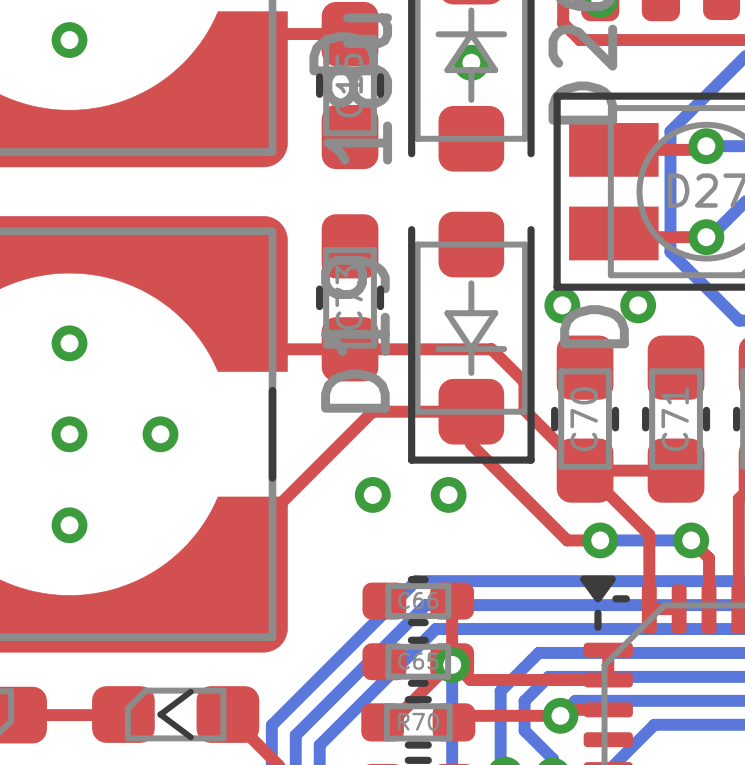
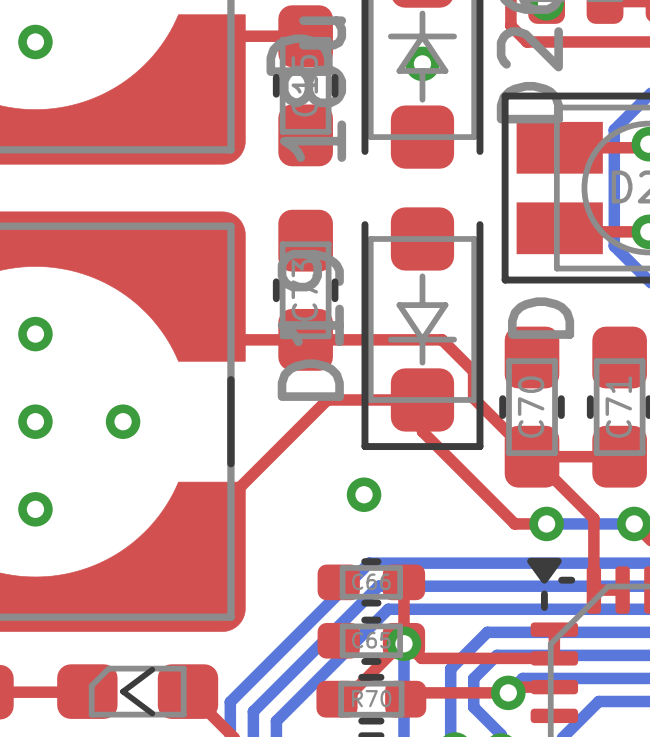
via: (562, 305) -> none
via: (638, 305) -> none
via: (372, 494) -> none
via: (448, 494) -> none
via: none -> (364, 494)

